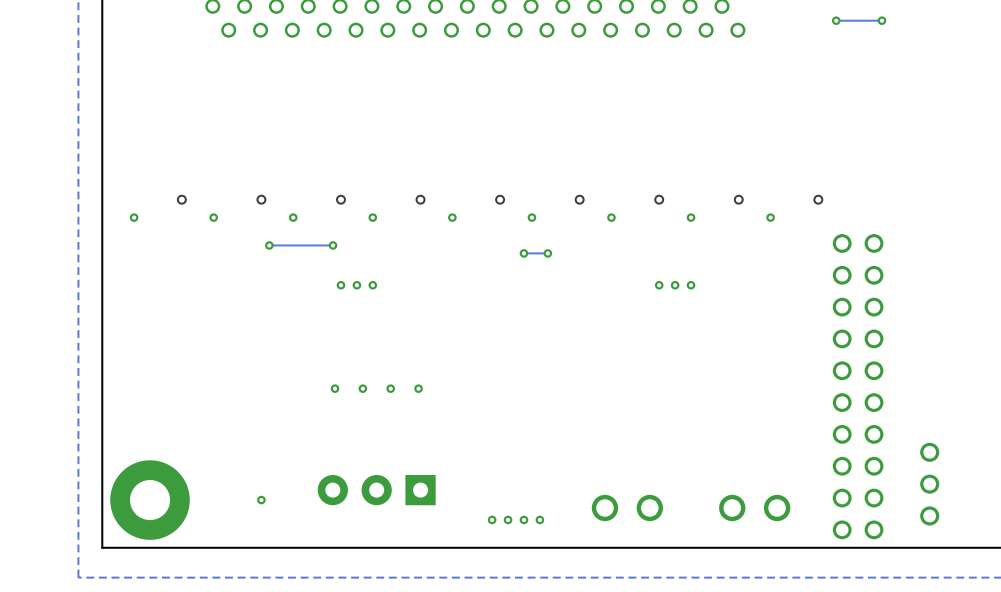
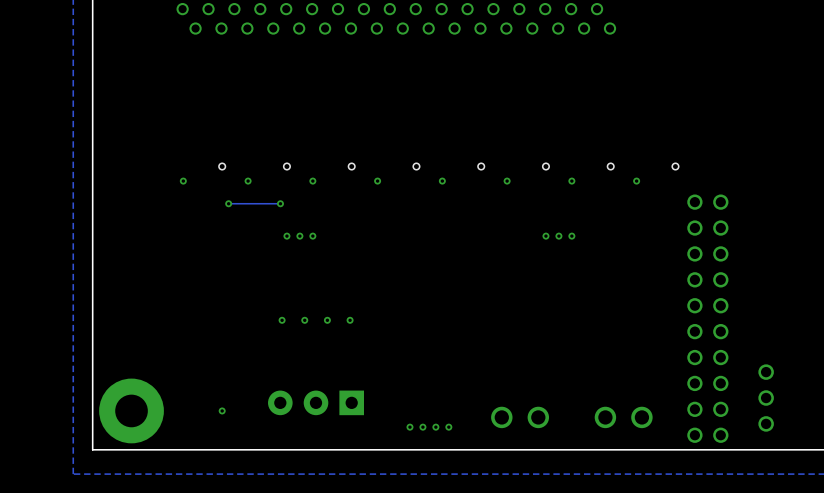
via: (836, 20) -> none
track: (881, 20) (836, 20) -> none
via: (881, 20) -> none
part: (181, 199) -> none
via: (134, 217) -> none
via: (523, 253) -> none
track: (547, 253) (523, 253) -> none
via: (547, 253) -> none

